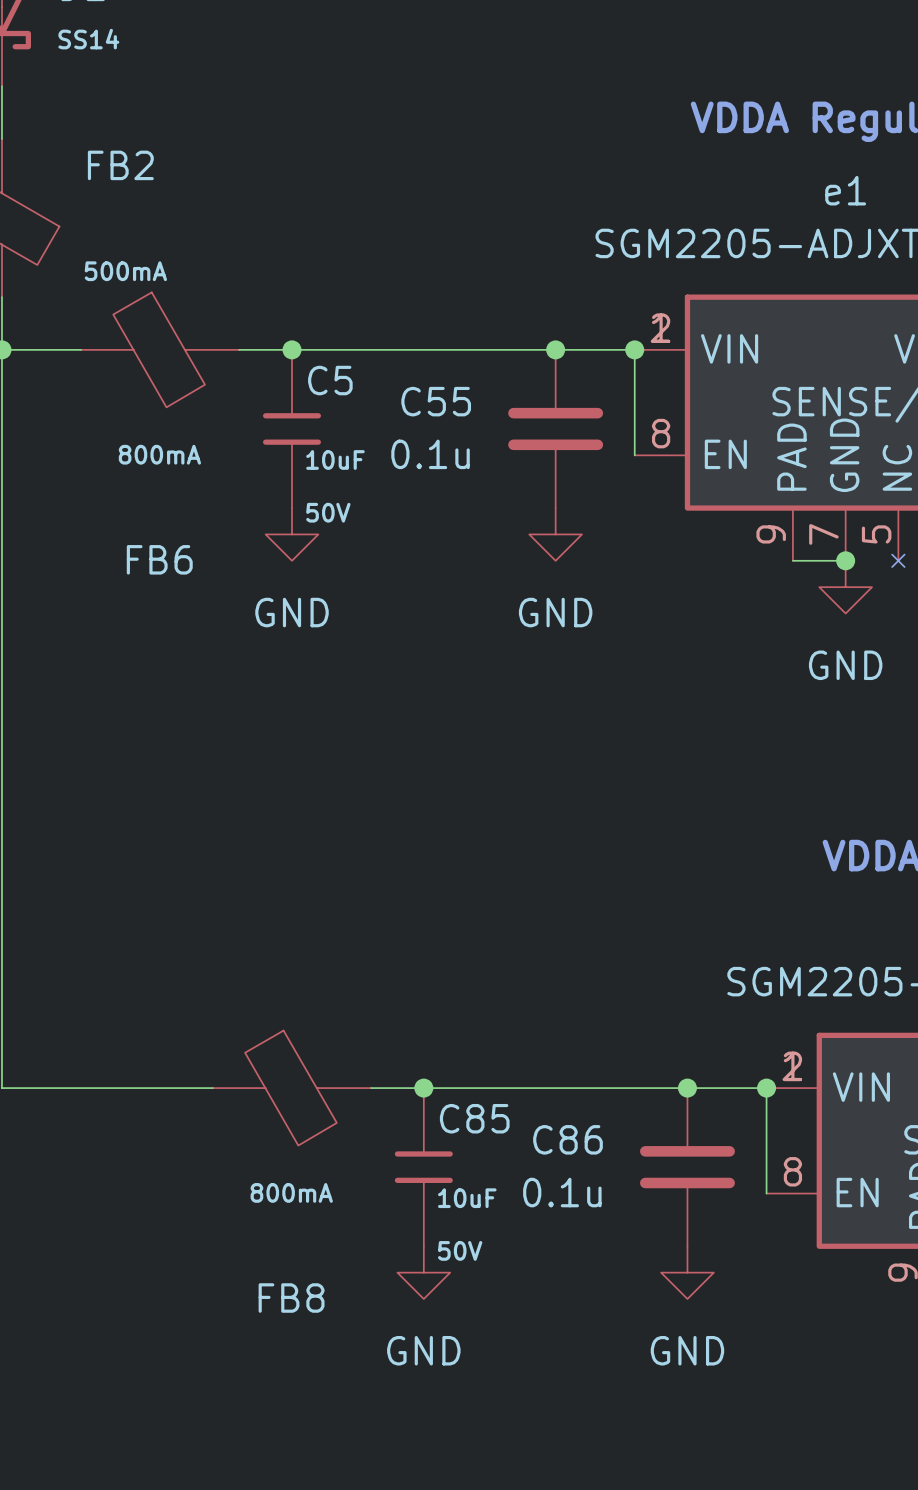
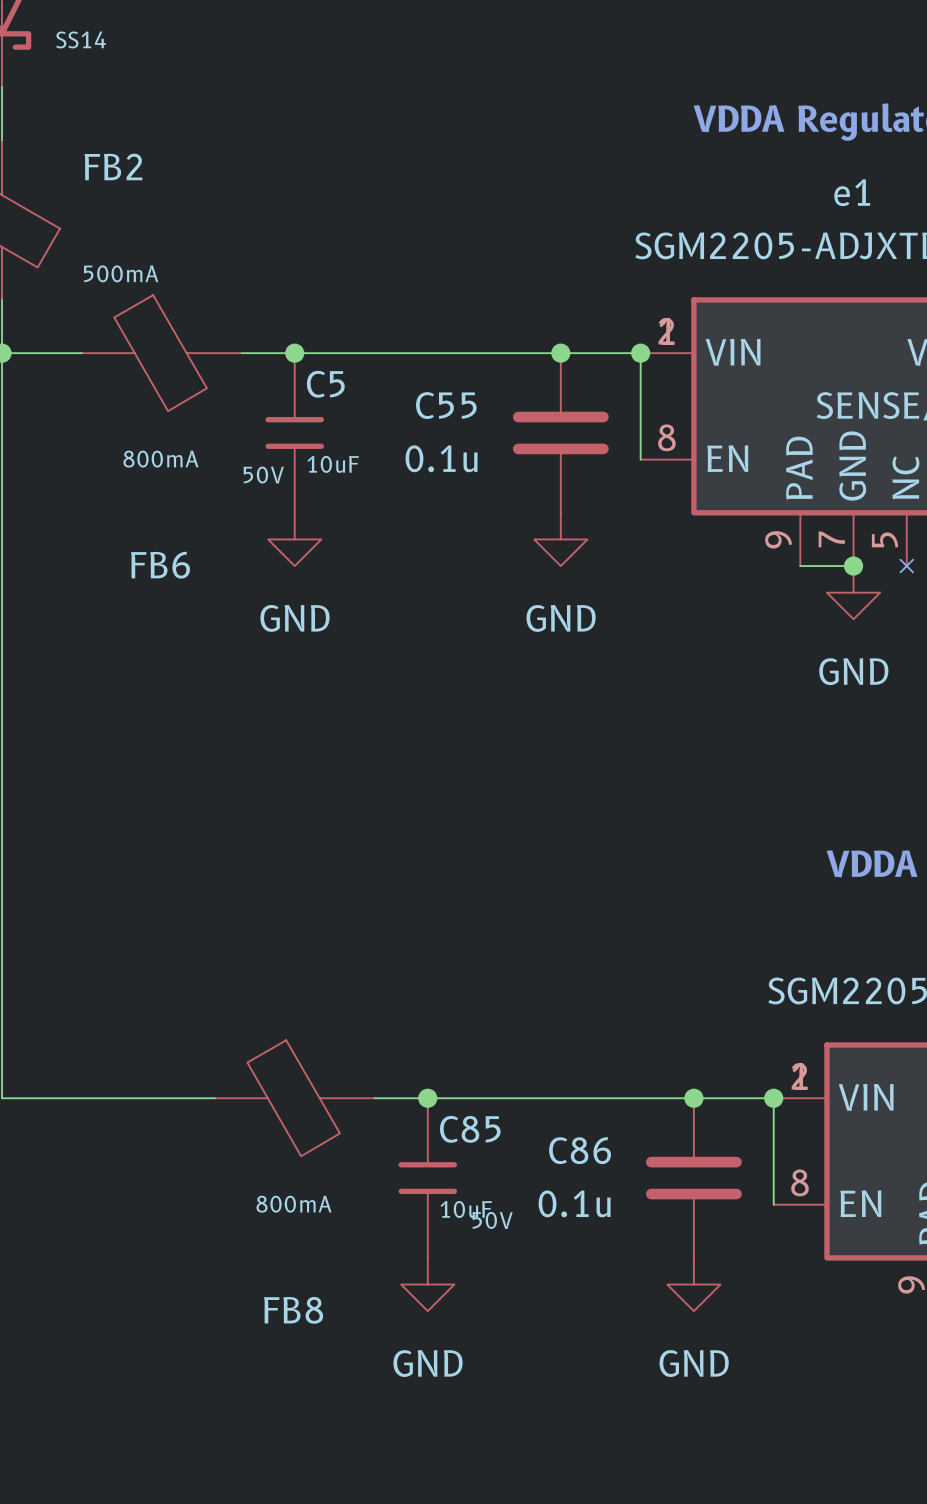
C5 text position: 50V (328, 512) -> 50V (263, 475)
C85 text position: 50V (460, 1250) -> 50V (492, 1220)

